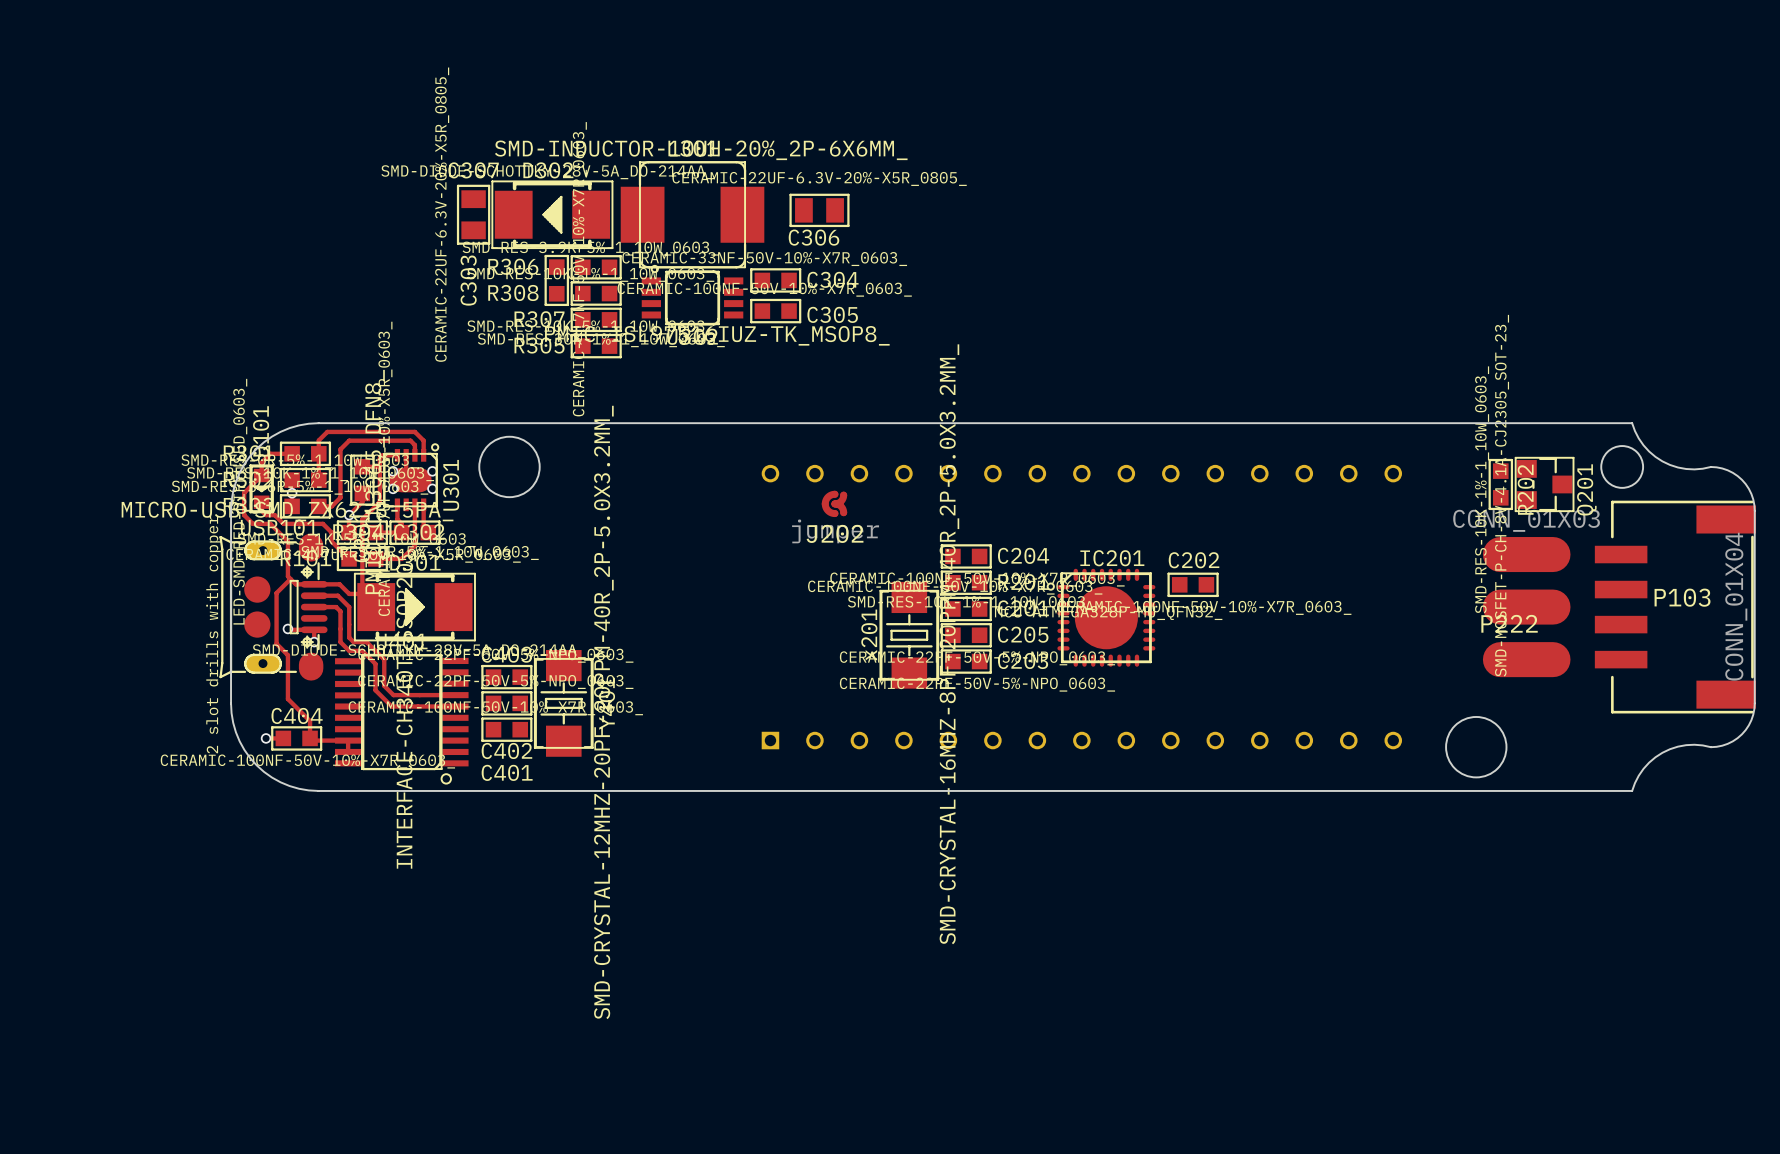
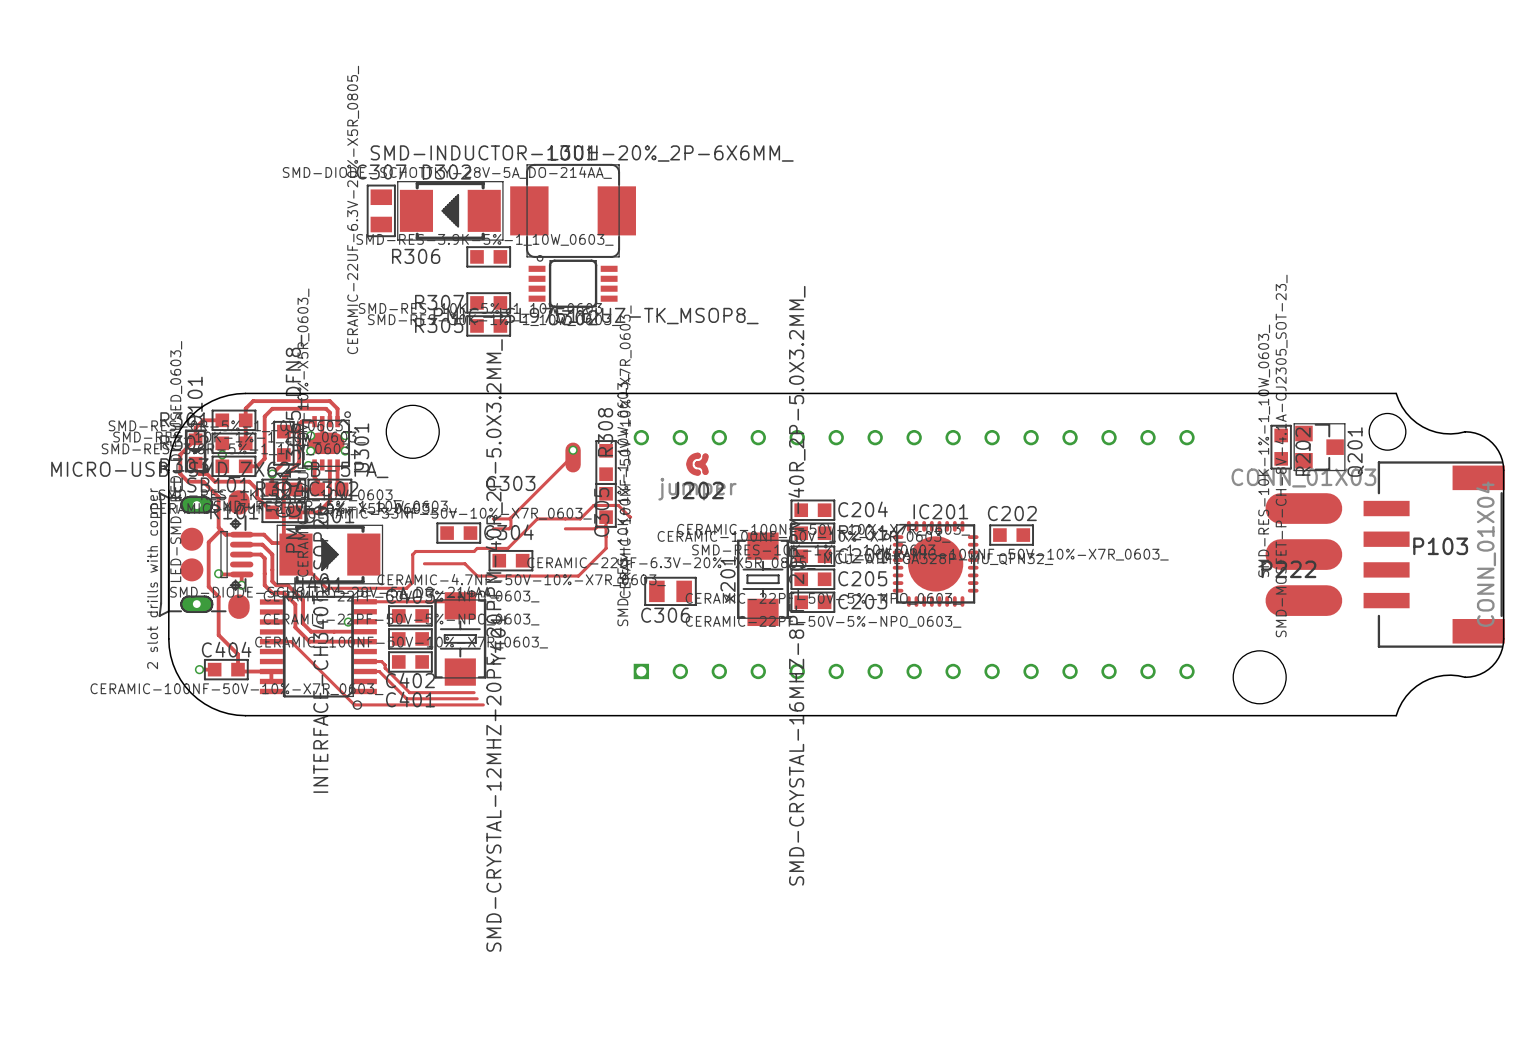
C306 position: (819, 210) -> (670, 591)
C303 rotation: 0° (556, 280) -> 90° clockwise (510, 560)
C303 position: (556, 280) -> (510, 560)
C304 position: (775, 280) -> (458, 533)
R308 rotation: 0° (596, 293) -> 90° clockwise (606, 505)
R308 position: (596, 293) -> (606, 505)
C305 rotation: 0° (775, 311) -> 90° clockwise (606, 462)
C305 position: (775, 311) -> (606, 462)
via: none -> (573, 450)
track: none -> (573, 464) (573, 450) (573, 455) (509, 518) (493, 518)
via: none -> (308, 465)
track: none -> (606, 517) (606, 548) (578, 576) (477, 576) (464, 563) (424, 563)
track: none -> (630, 517) (618, 505) (593, 505) (580, 518) (537, 518) (507, 548) (477, 548) (474, 551) (415, 551) (412, 554) (412, 582) (406, 588) (326, 588) (293, 554)
track: none -> (510, 517) (510, 526) (509, 528) (493, 528)
track: none -> (606, 526) (565, 528)
track: none -> (365, 601) (456, 601) (460, 605)
via: none -> (348, 622)
track: none -> (271, 641) (291, 641) (354, 704) (483, 704)
track: none -> (365, 661) (381, 661) (385, 668) (409, 692) (474, 692)
track: none -> (365, 671) (379, 671) (406, 698) (477, 698)

